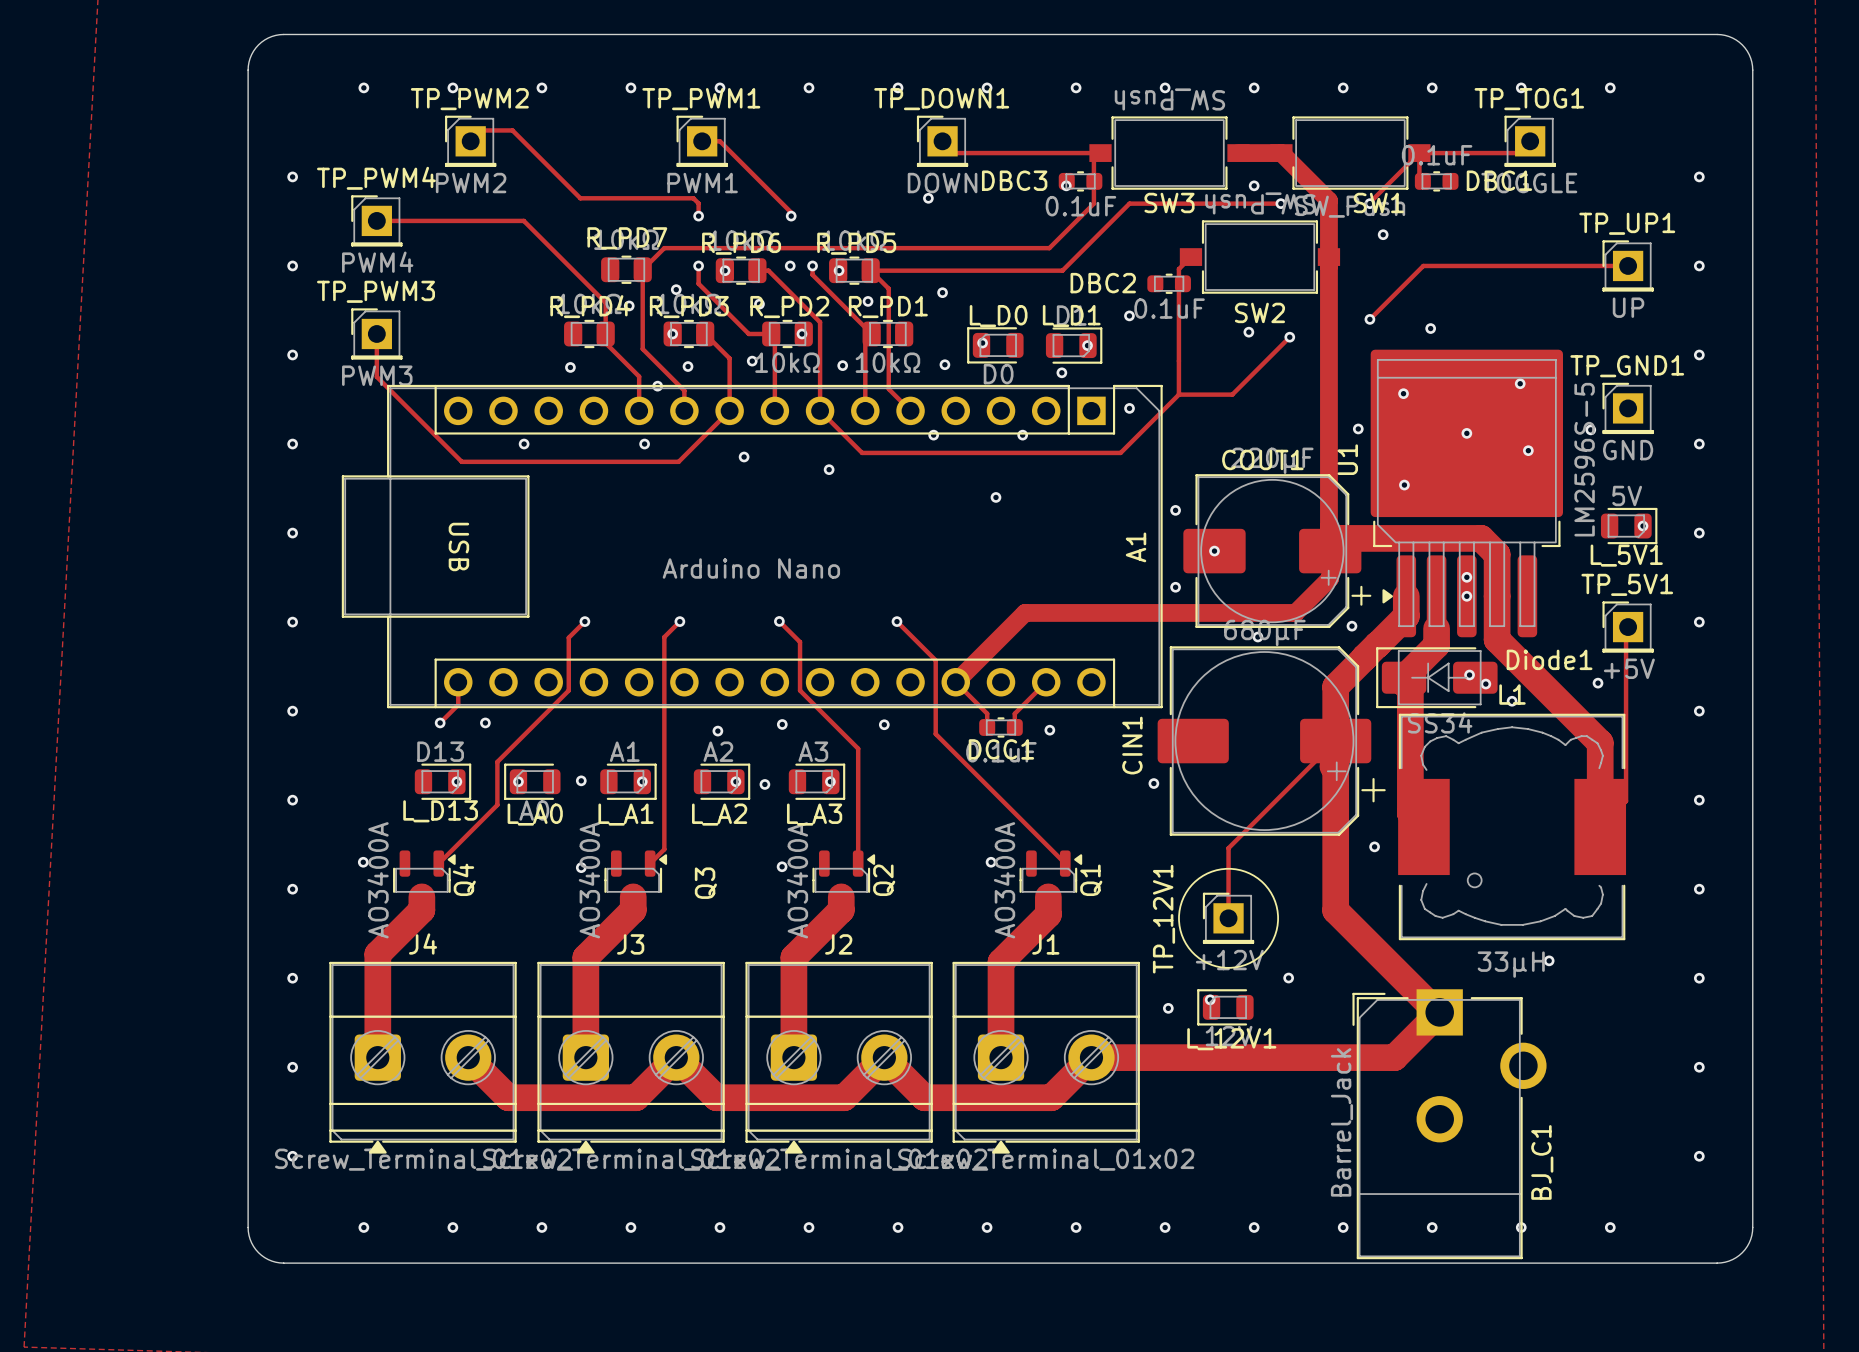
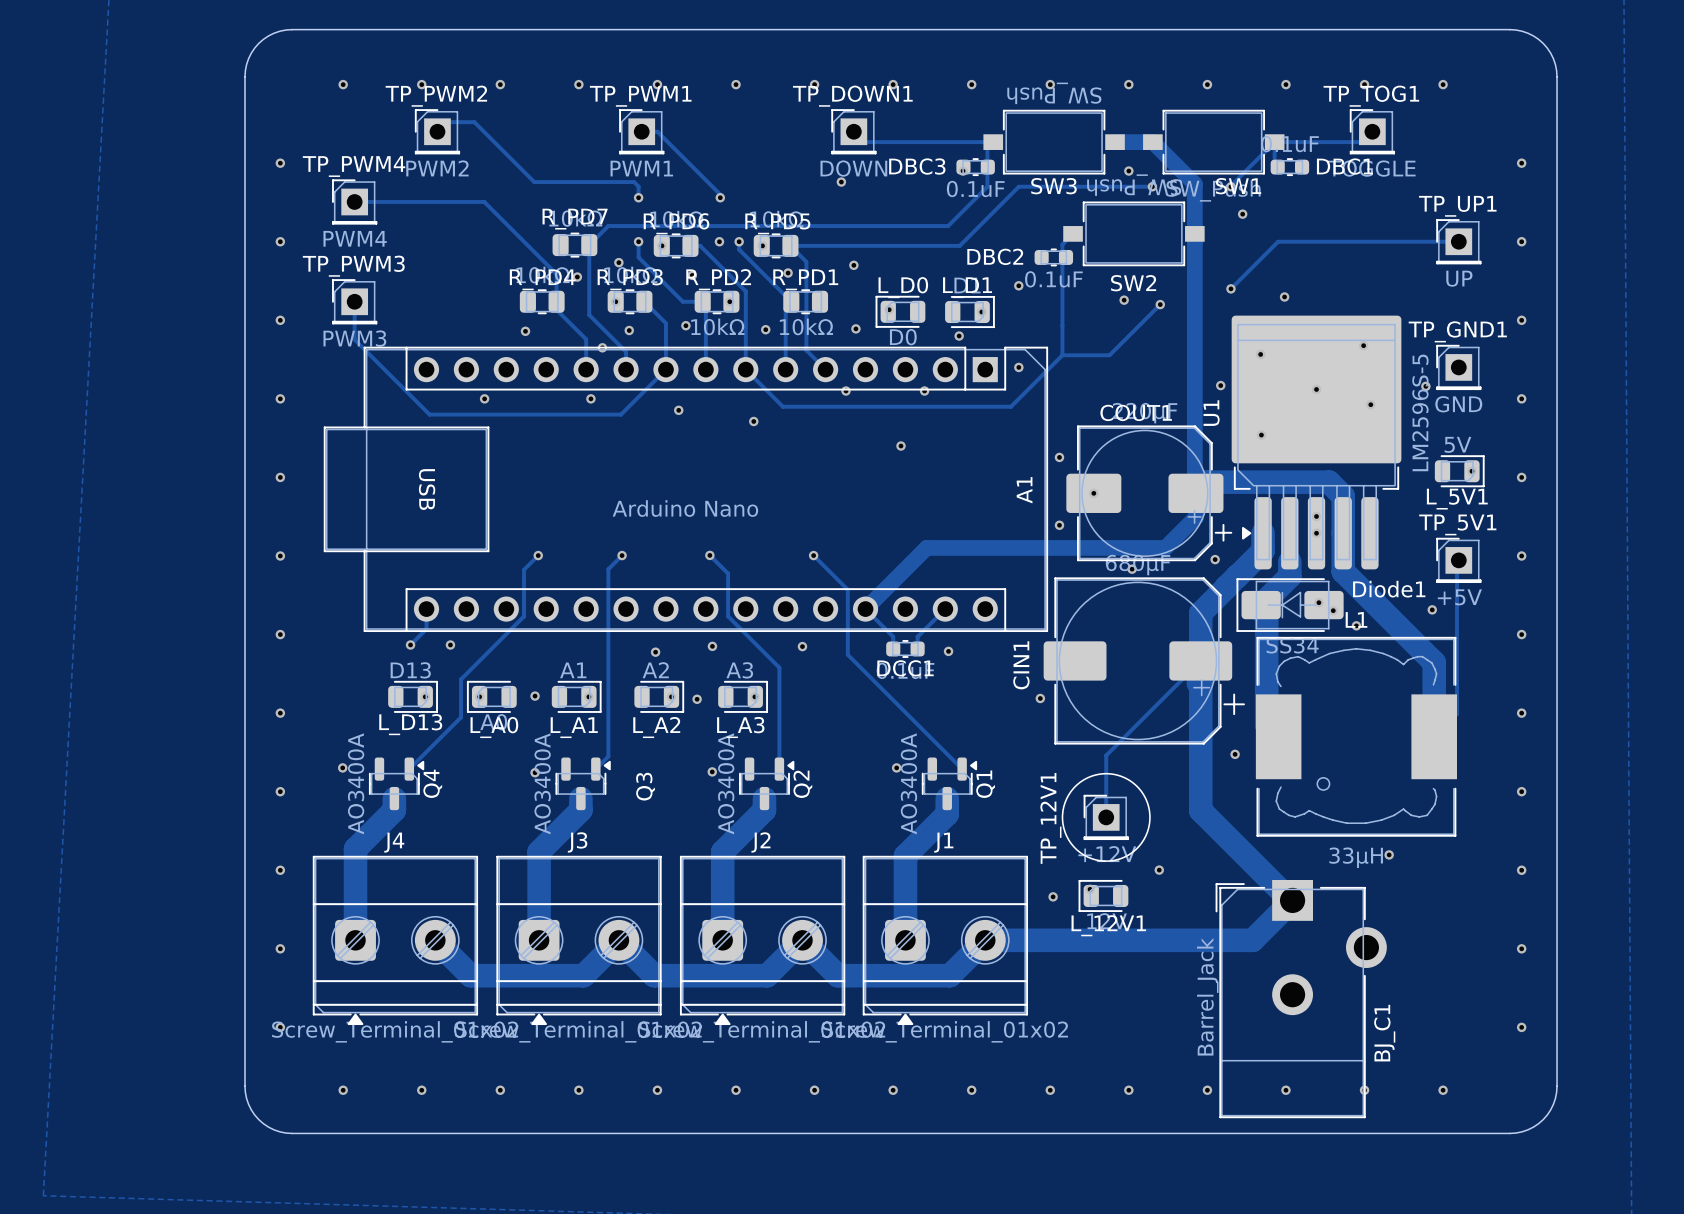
board edge: (283, 34) (1717, 34) (1728, 36) (1739, 42) (1749, 54) (1752, 70) (1752, 1227) (1750, 1239) (1744, 1249) (1732, 1259) (1717, 1263) (283, 1263) (271, 1261) (261, 1255) (251, 1242) (248, 1227) (248, 70) (251, 54) (258, 44) (268, 38) (283, 34) -> (292, 29) (274, 33) (258, 43) (248, 58) (244, 76) (244, 1086) (248, 1104) (254, 1115) (263, 1123) (279, 1131) (292, 1133) (1509, 1133) (1527, 1129) (1538, 1123) (1547, 1115) (1553, 1104) (1557, 1086) (1557, 76) (1555, 64) (1550, 53) (1538, 39) (1522, 31) (1509, 29) (292, 29)

